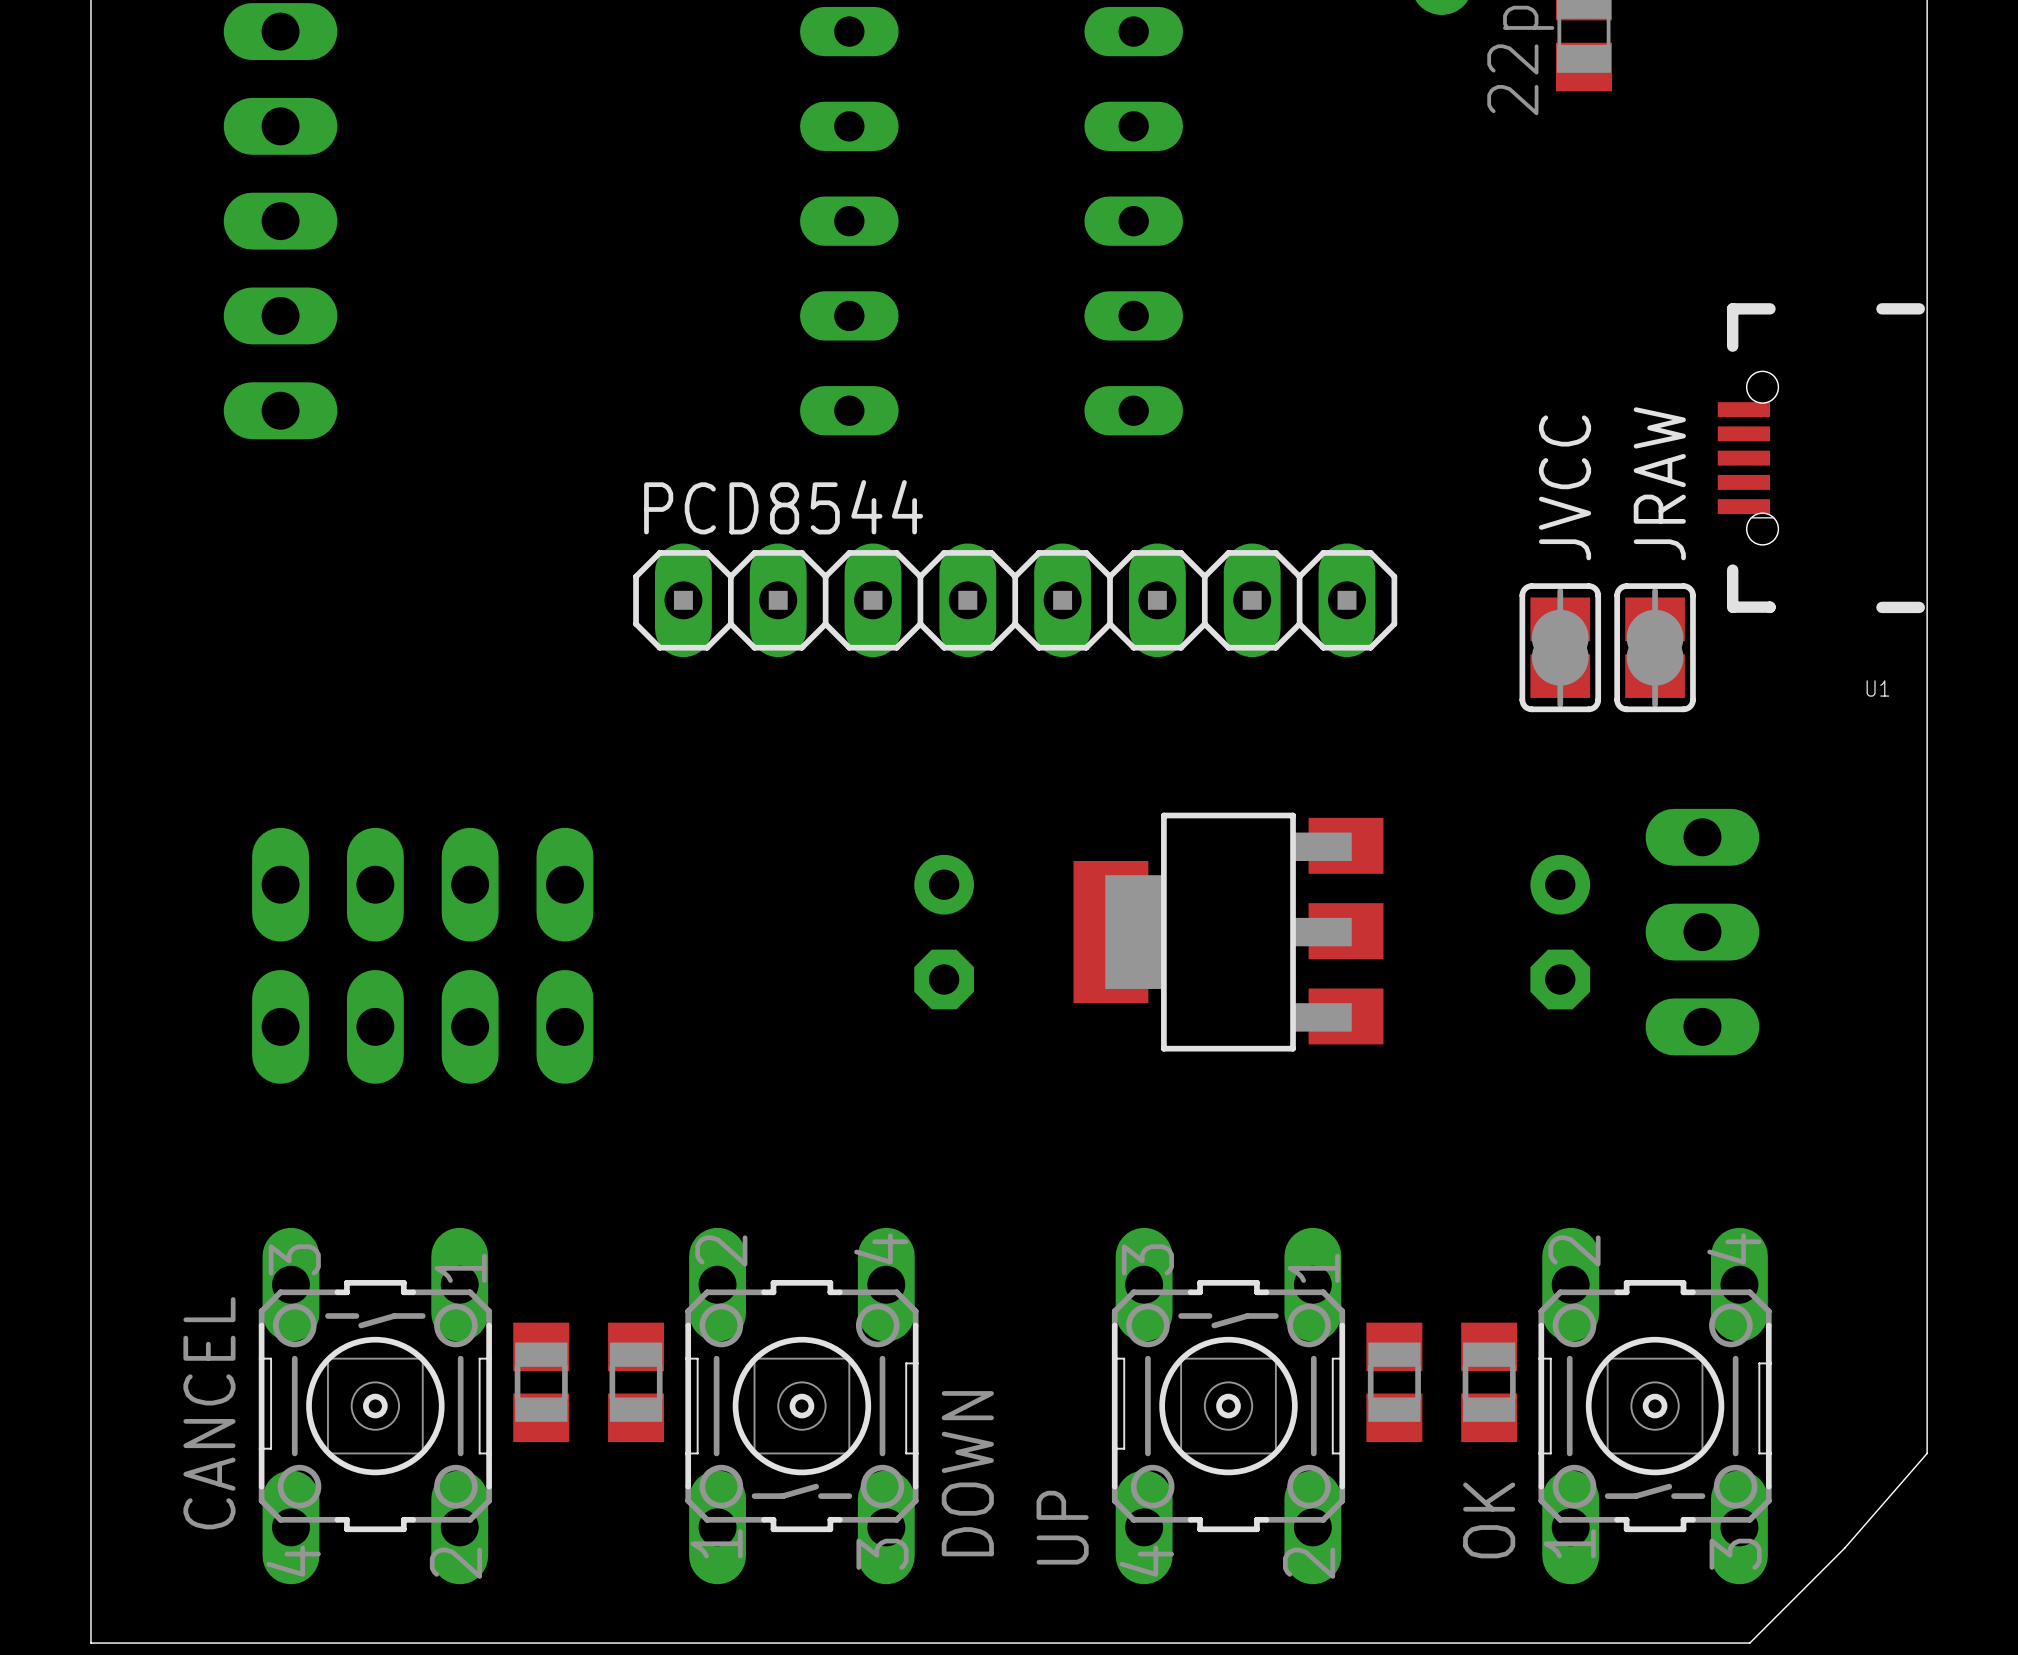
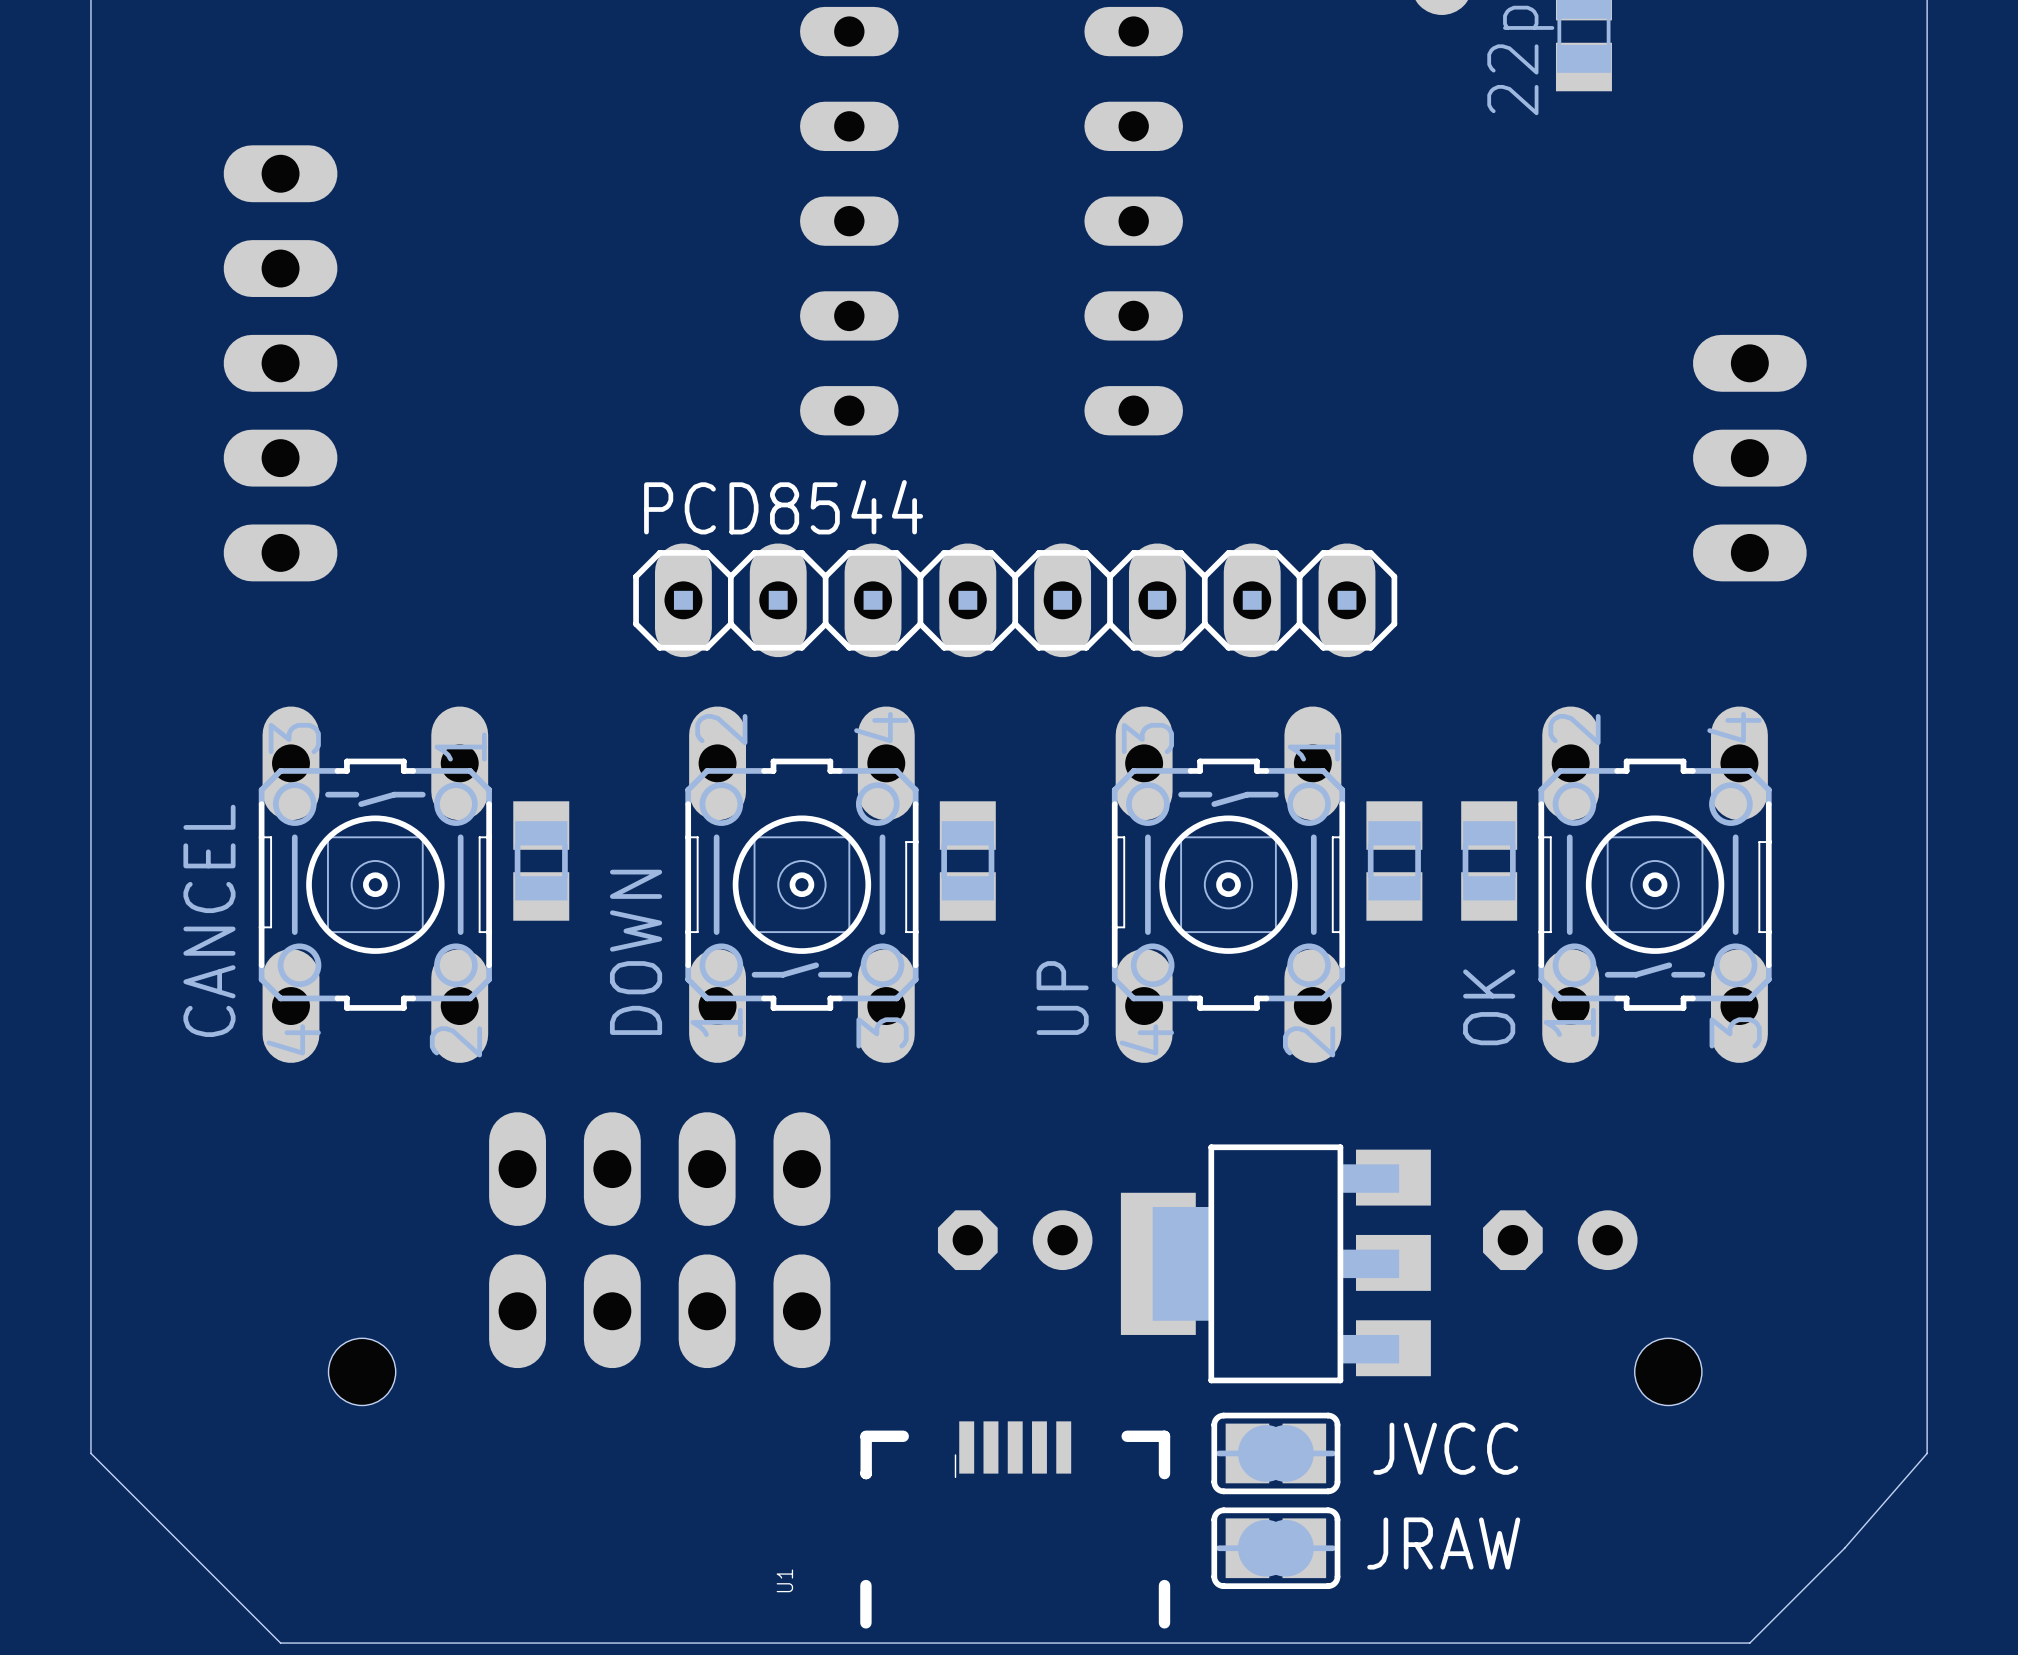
part position: (280, 221) -> (280, 363)
U1 footprint: [1717, 303, 1925, 614] -> [860, 1421, 1171, 1629]
JVCC rotation: 0° (1560, 647) -> 90° clockwise (1275, 1453)
JVCC position: (1560, 647) -> (1275, 1453)
JRAW: (1655, 647) -> none
U1 name position: U1 (1877, 688) -> U1 (784, 1580)
part: none -> (541, 861)
part: none -> (967, 861)
part: none -> (1394, 861)
part: none -> (1489, 861)
part: (422, 884) -> none
part: (944, 932) -> none
part position: (1228, 932) -> (1275, 1263)
part rotation: 0° (1560, 932) -> 90° clockwise (1560, 1240)
part position: (1560, 932) -> (1560, 1240)
part position: (1702, 932) -> (1749, 458)
part: (422, 1026) -> none
part: none -> (659, 1169)
part: none -> (1015, 1240)
part: none -> (659, 1311)
hole: none -> (362, 1371)
hole: none -> (1668, 1371)
part: (541, 1382) -> none
part: (636, 1382) -> none
part: (1394, 1382) -> none
part: (1489, 1382) -> none
part position: (375, 1406) -> (375, 884)
part position: (801, 1406) -> (801, 884)
part position: (1228, 1406) -> (1228, 884)
part position: (1655, 1406) -> (1655, 884)
part value position: CANCEL (209, 1413) -> CANCEL (209, 920)
board edge: (90, 1453) (90, 1643) (280, 1643) -> (90, 1453) (280, 1643)
part value position: DOWN (967, 1473) -> DOWN (636, 952)
part value position: OK (1489, 1520) -> OK (1489, 1007)
part value position: UP (1062, 1527) -> UP (1062, 998)
JRAW: none -> (1275, 1548)

